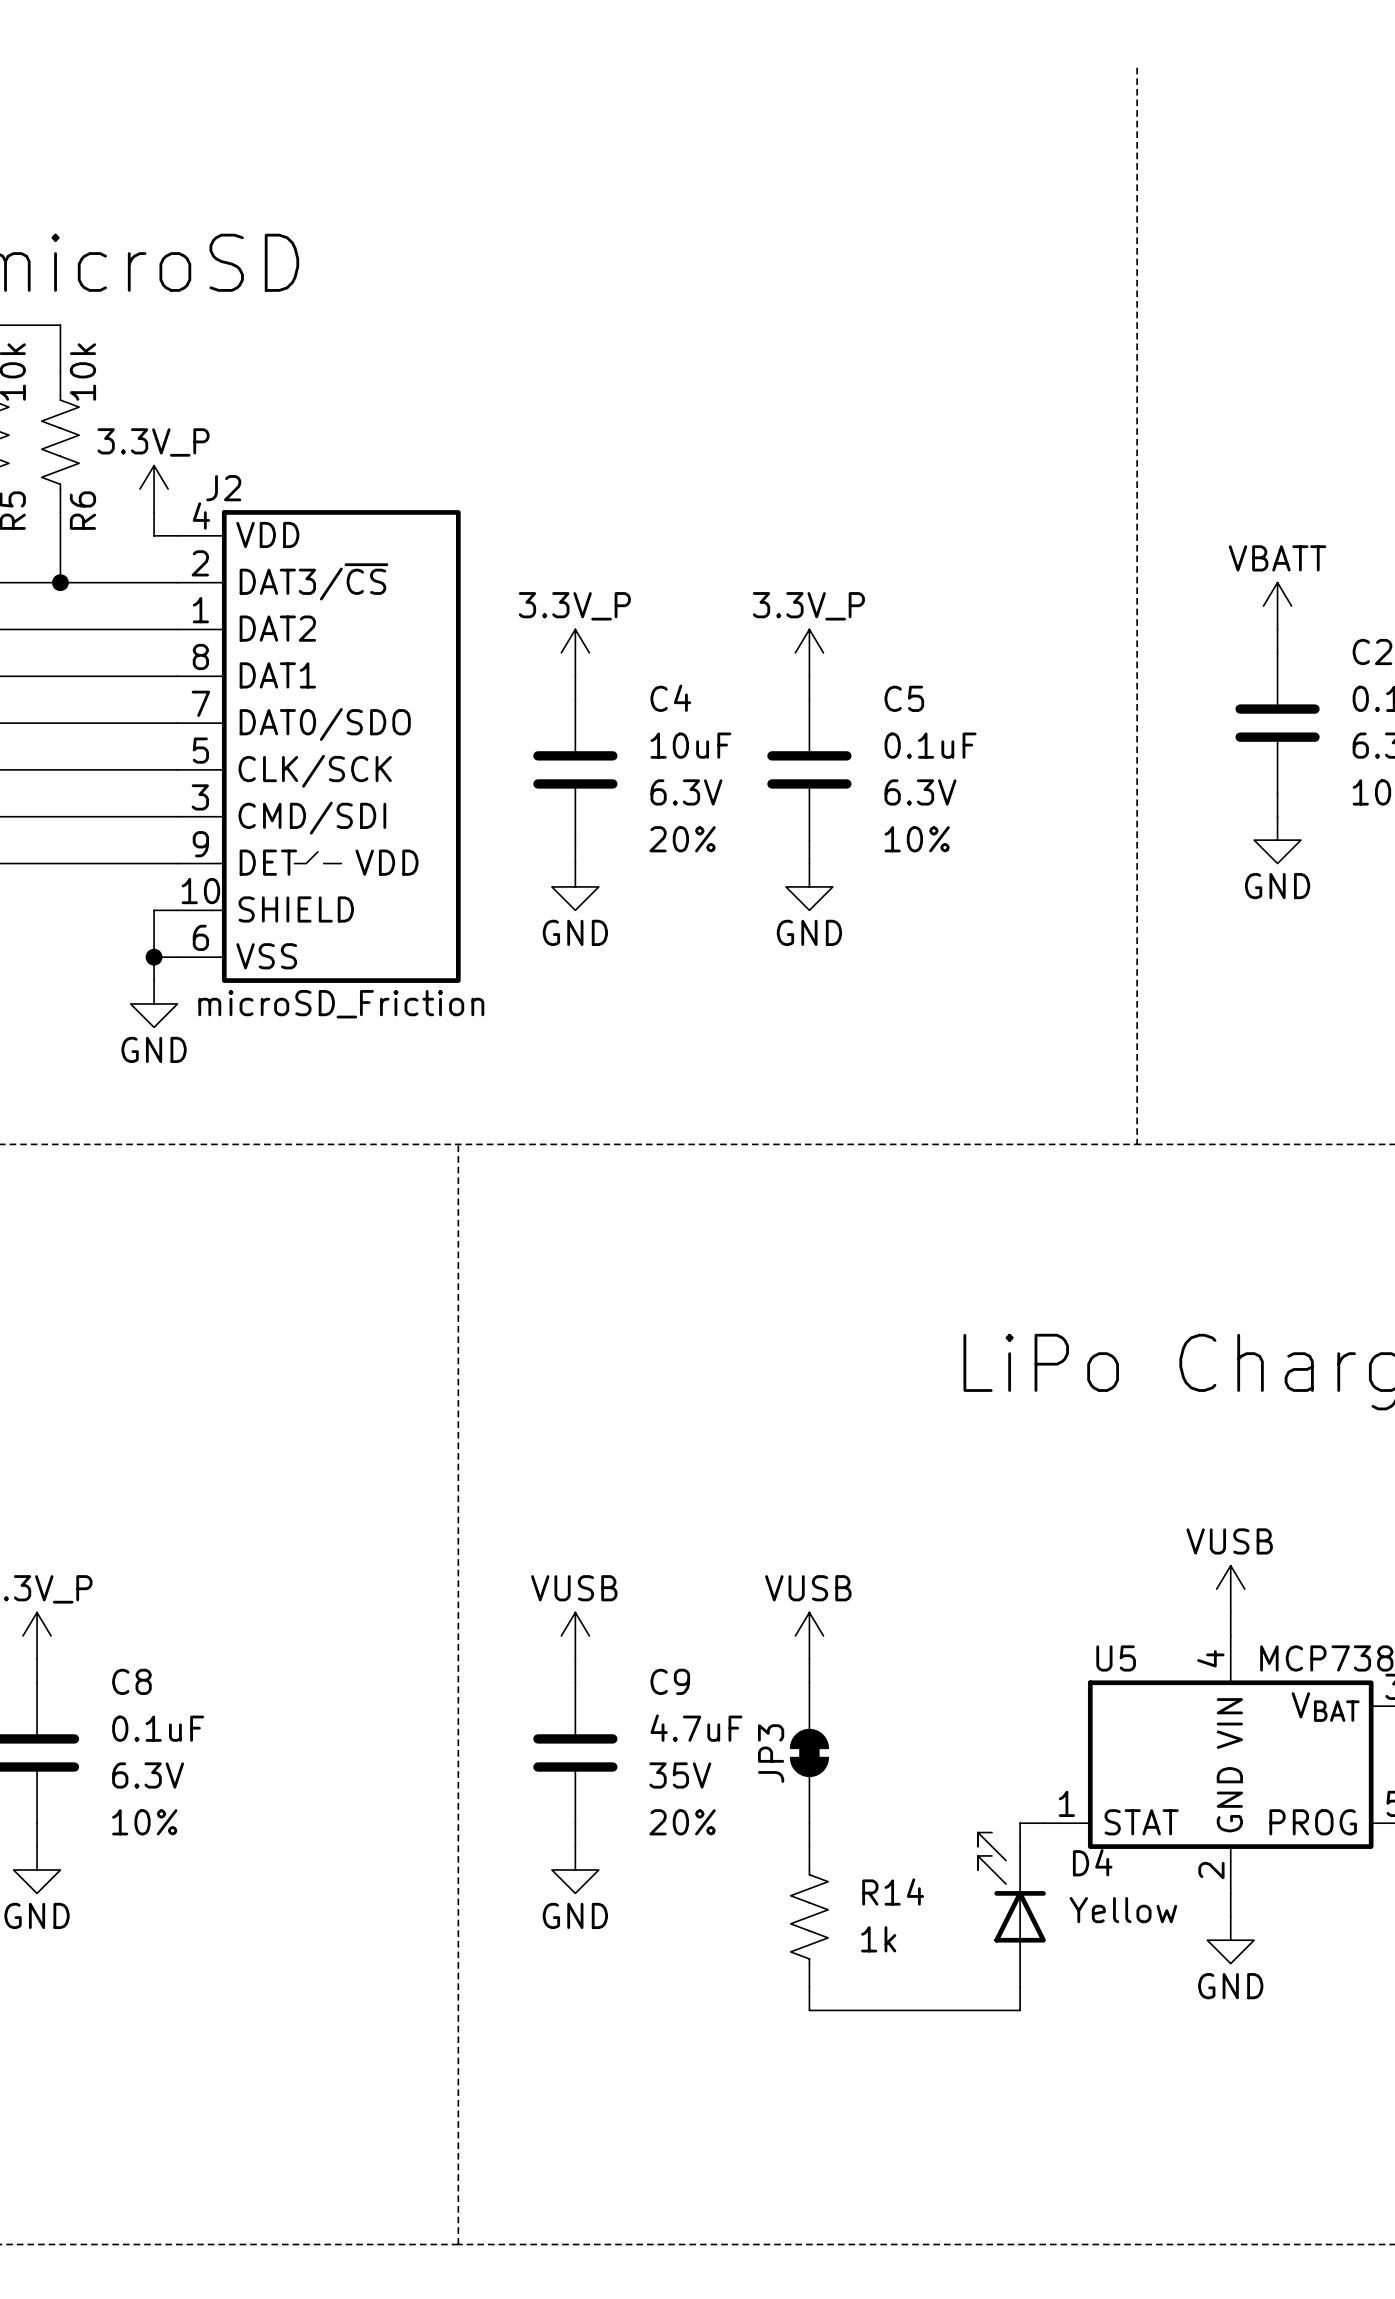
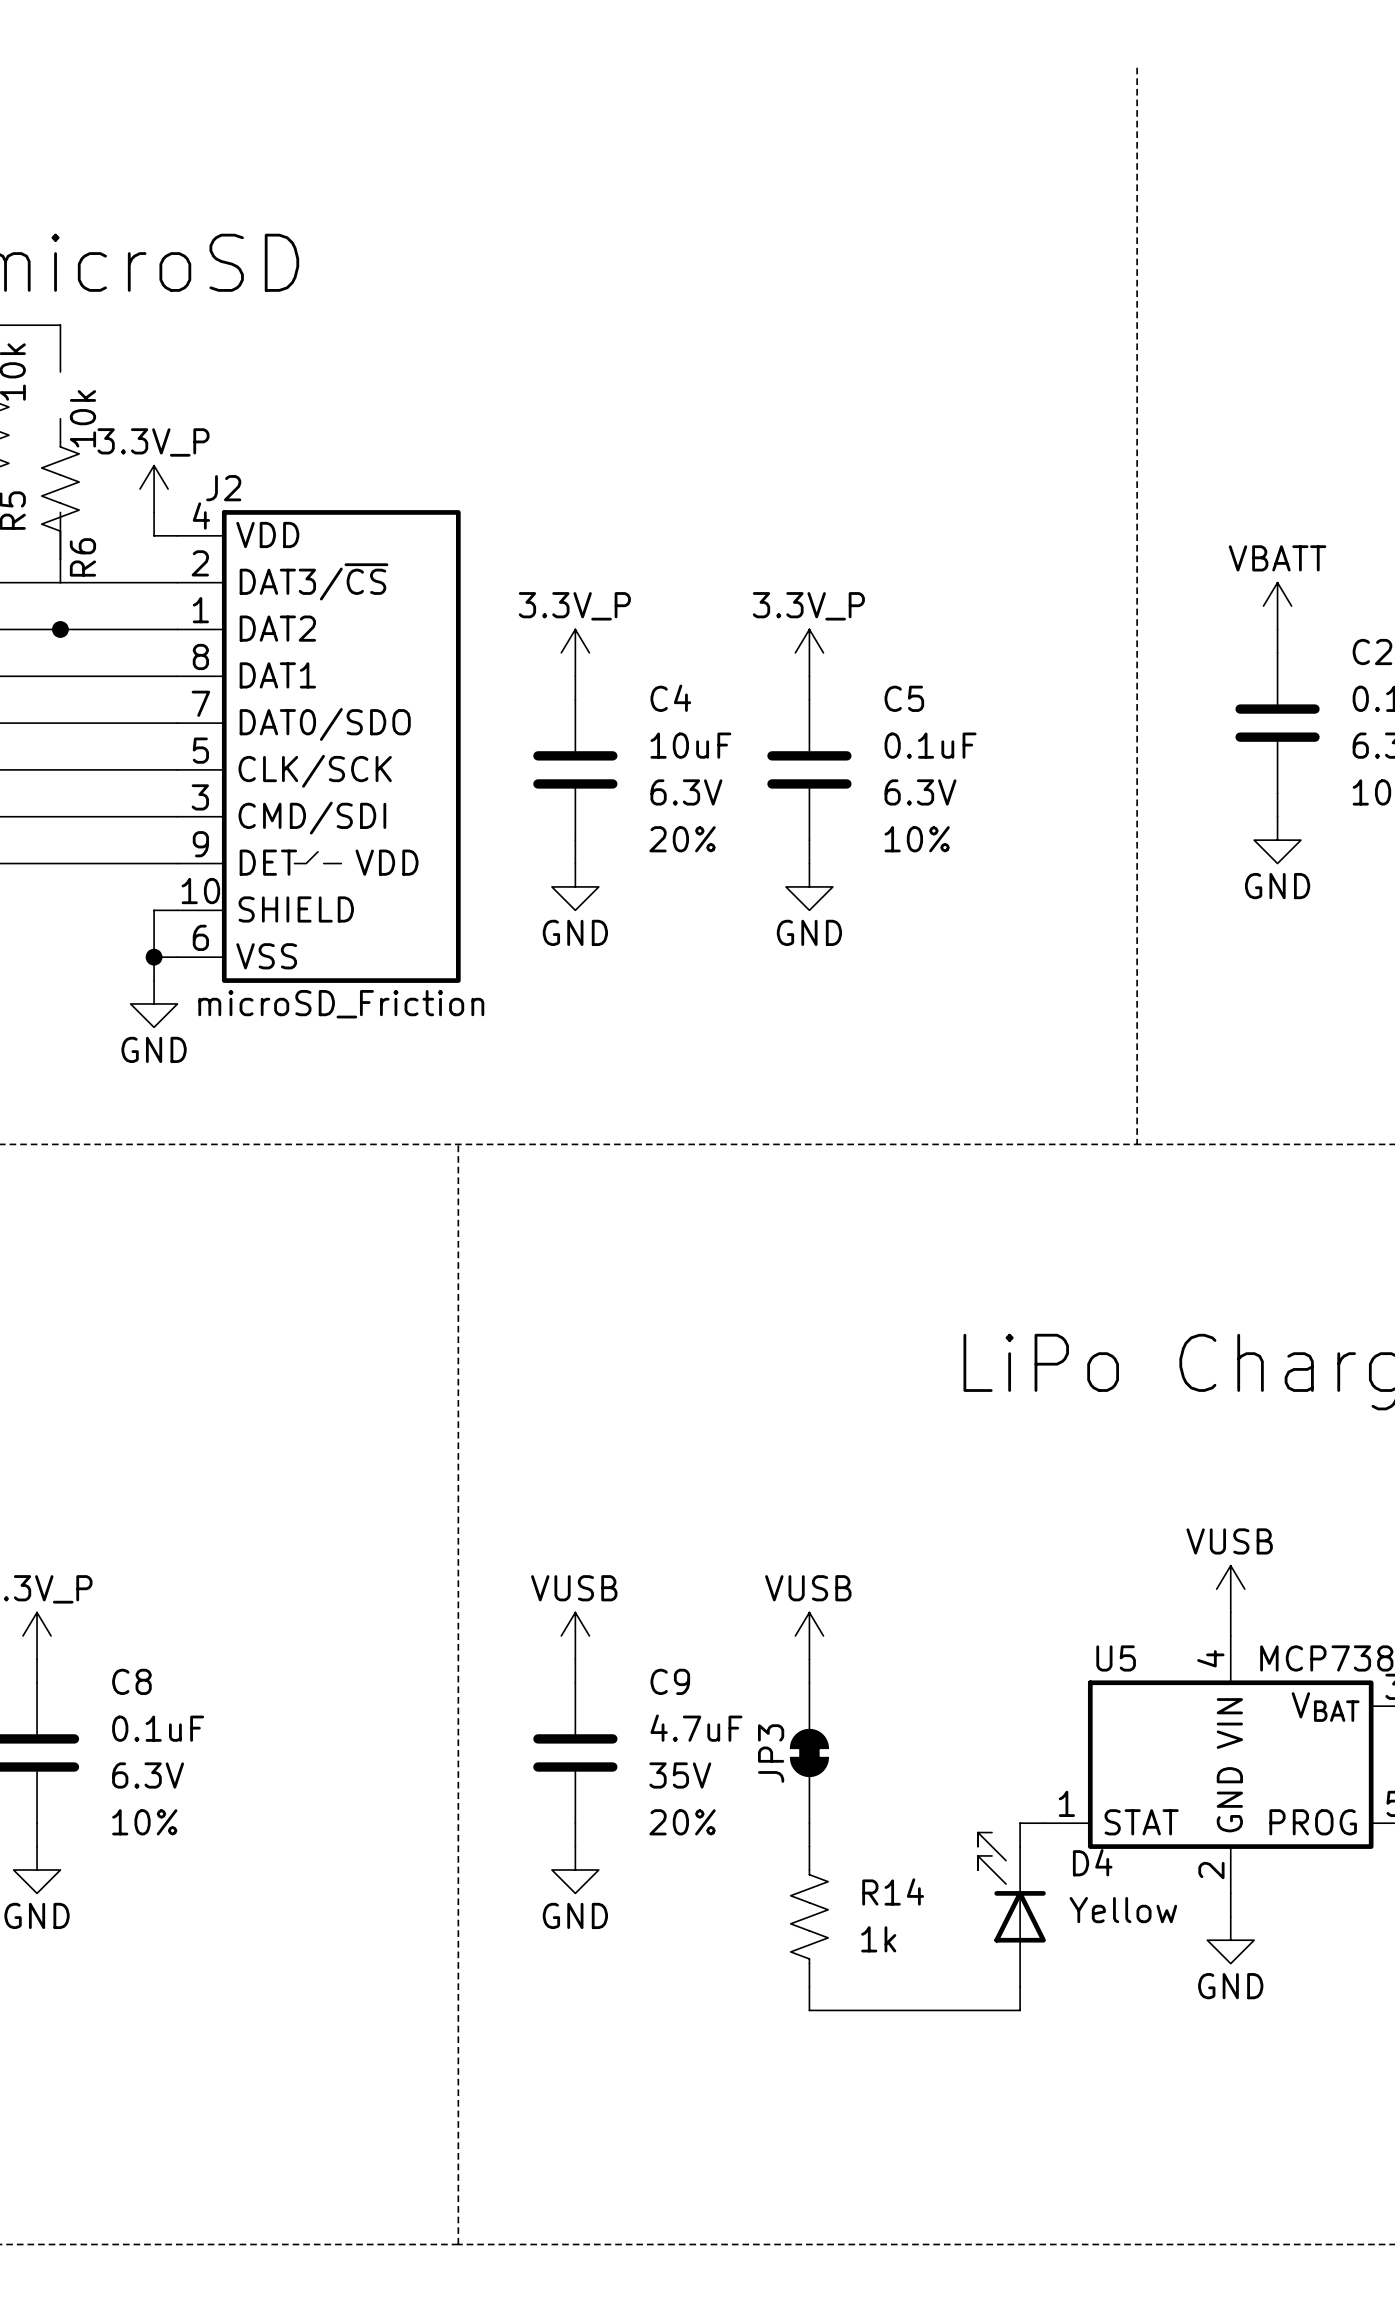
R6 position: (60, 442) -> (60, 489)
junction: (60, 582) -> none
junction: none -> (60, 629)

